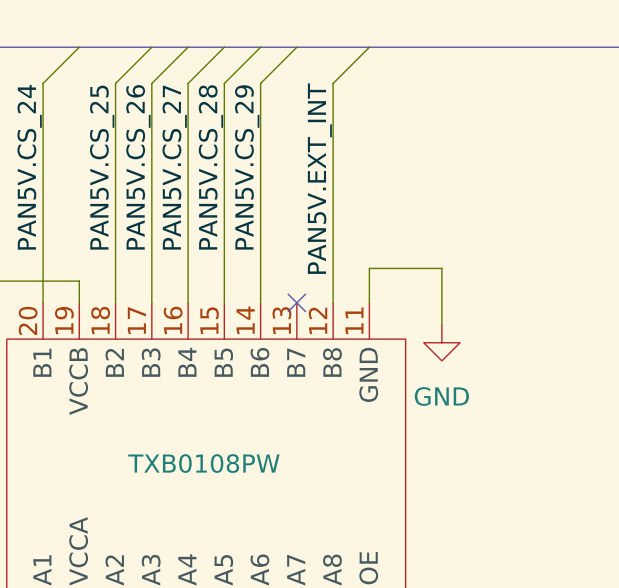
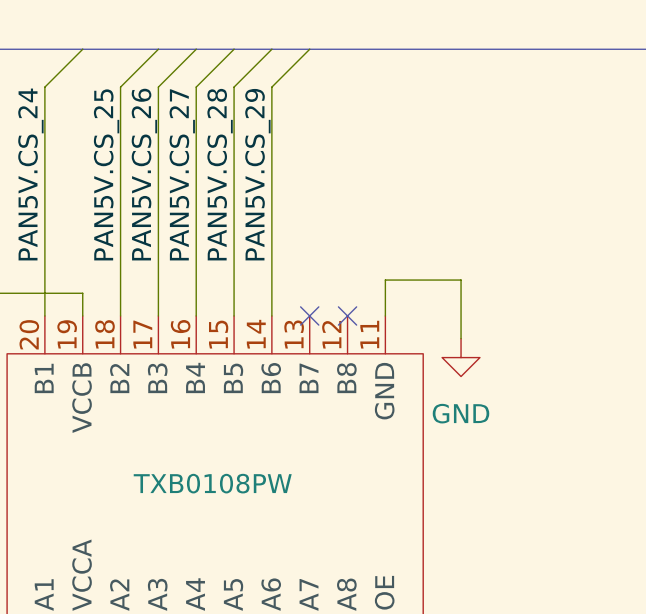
wire: (369, 47) (333, 83) (333, 302) -> none
label: PAN5V.EXT_INT (319, 178) -> none
no-connect mark: none -> (347, 315)

